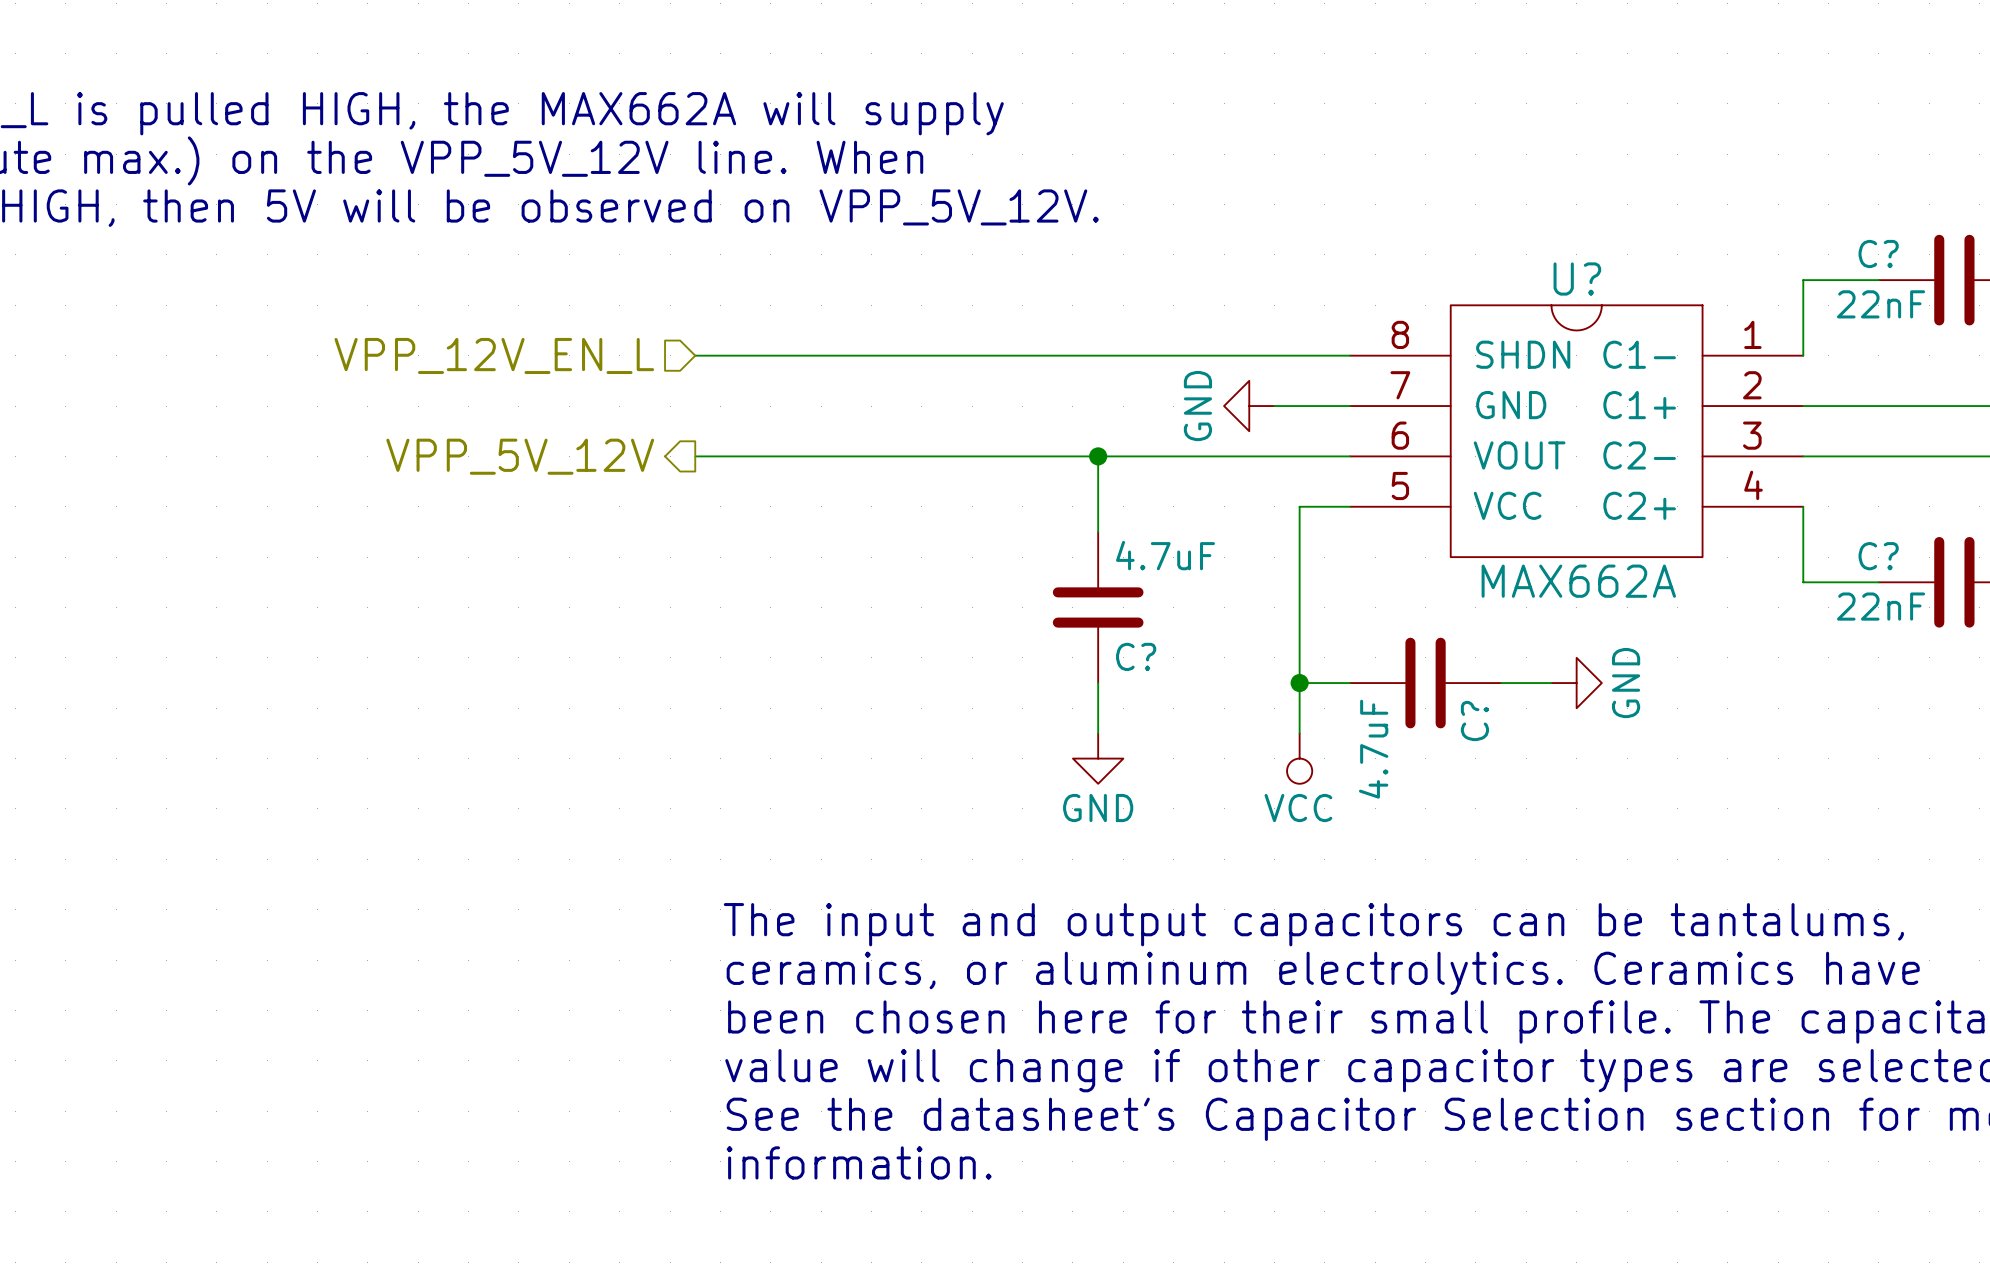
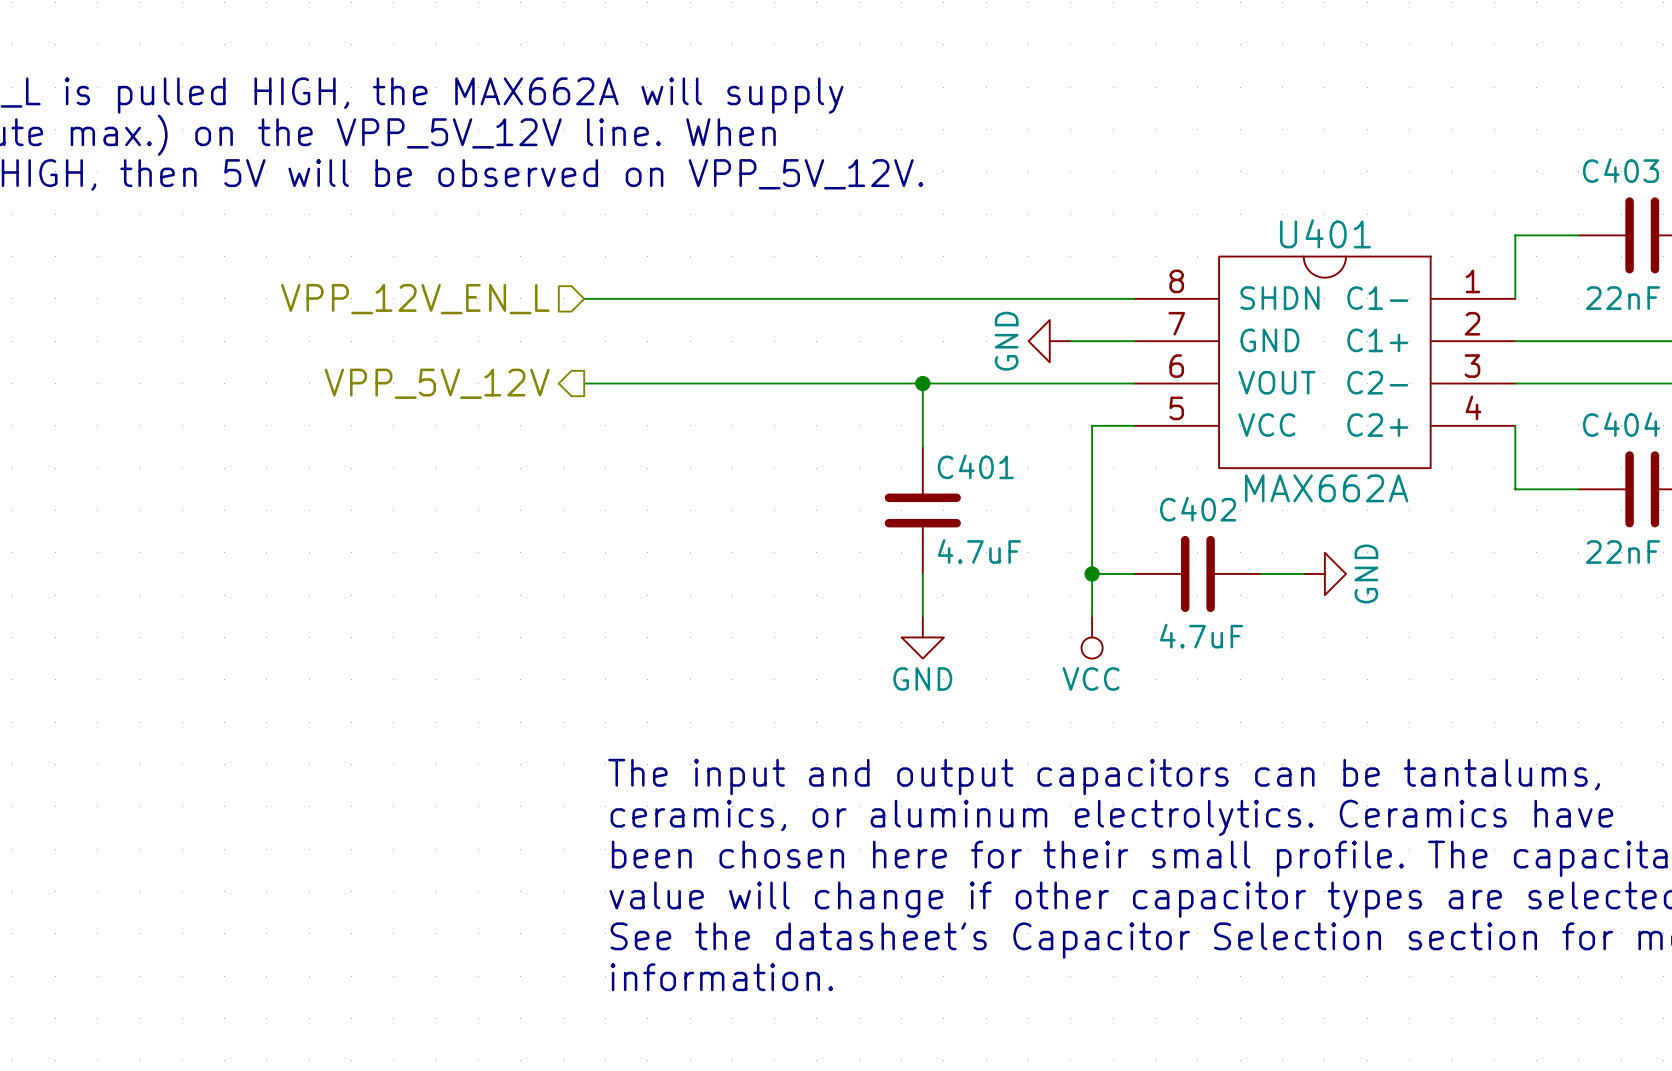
C? name: C? (1878, 254) -> C403 (1620, 170)
U? name: U? (1577, 278) -> U401 (1325, 233)
C? value position: 22nF (1881, 304) -> 22nF (1622, 298)
C? value position: 4.7uF (1165, 555) -> 4.7uF (979, 551)
C? name: C? (1878, 556) -> C404 (1621, 424)
C? value position: 22nF (1881, 606) -> 22nF (1622, 552)
C? name: C? (1136, 656) -> C401 (975, 466)
C? name: C? (1474, 721) -> C402 (1198, 509)
C? value rotation: 0° (1373, 749) -> 90° clockwise (1201, 636)

